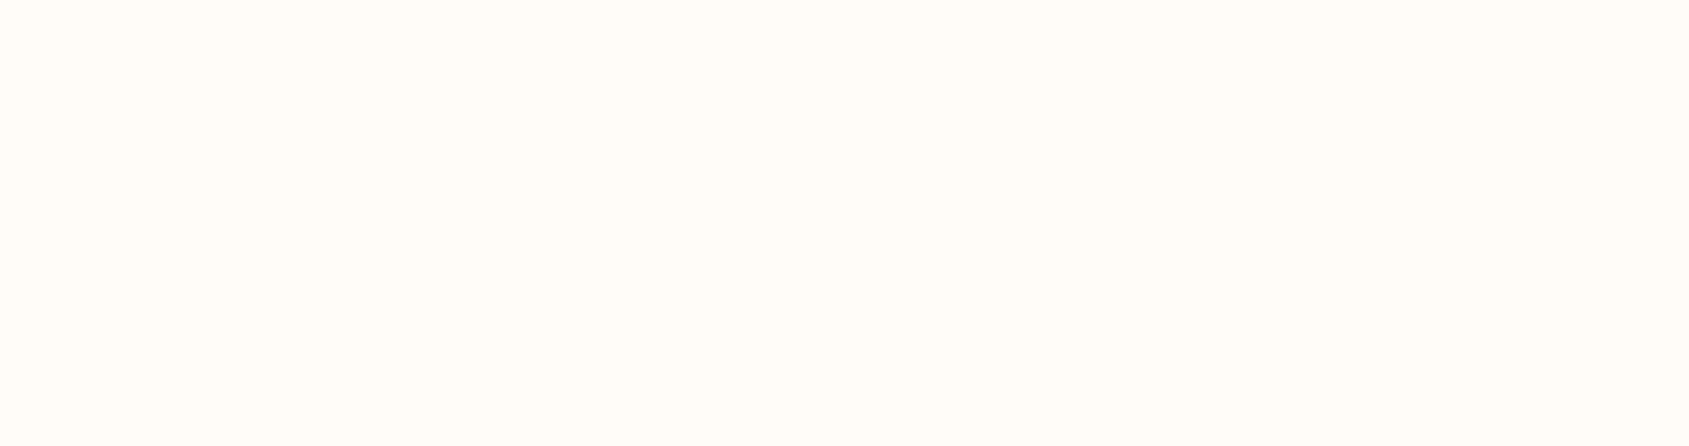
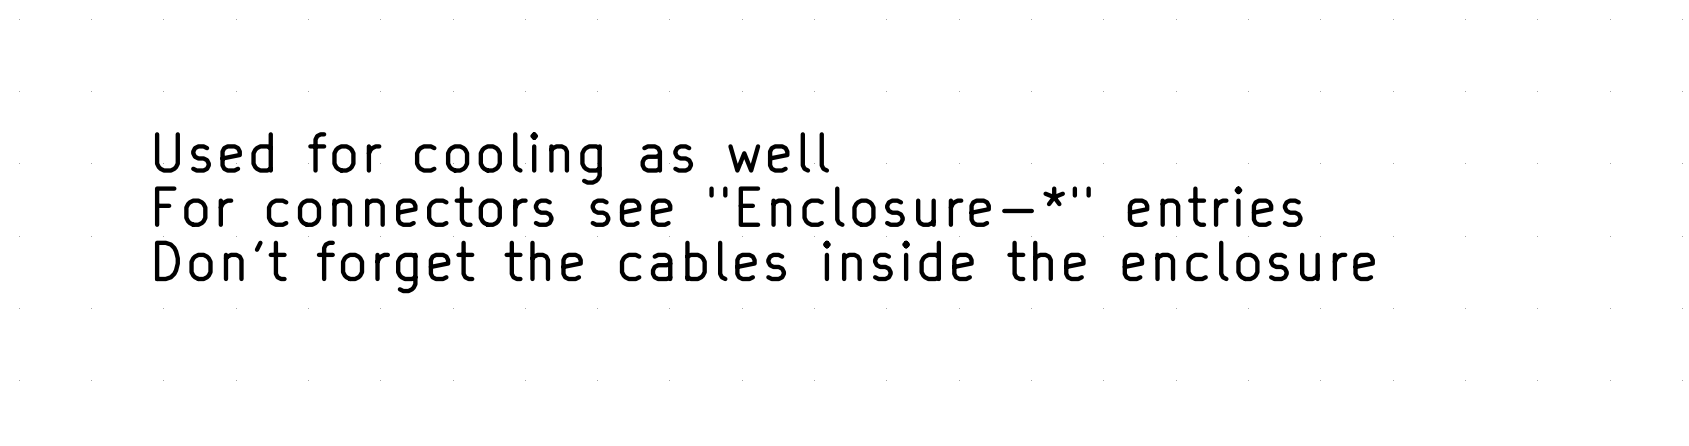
text: none -> Used for cooling as well (492, 158)
text: none -> For connectors see "Enclosure-*" entries (728, 206)
text: none -> Don't forget the cables inside the enclosure (764, 266)

